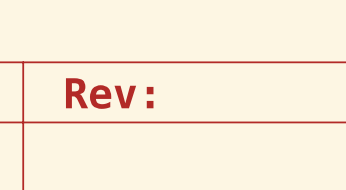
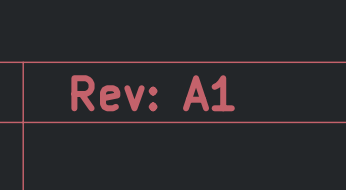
title block: Rev: (109, 93) -> Rev: A1 (153, 93)

